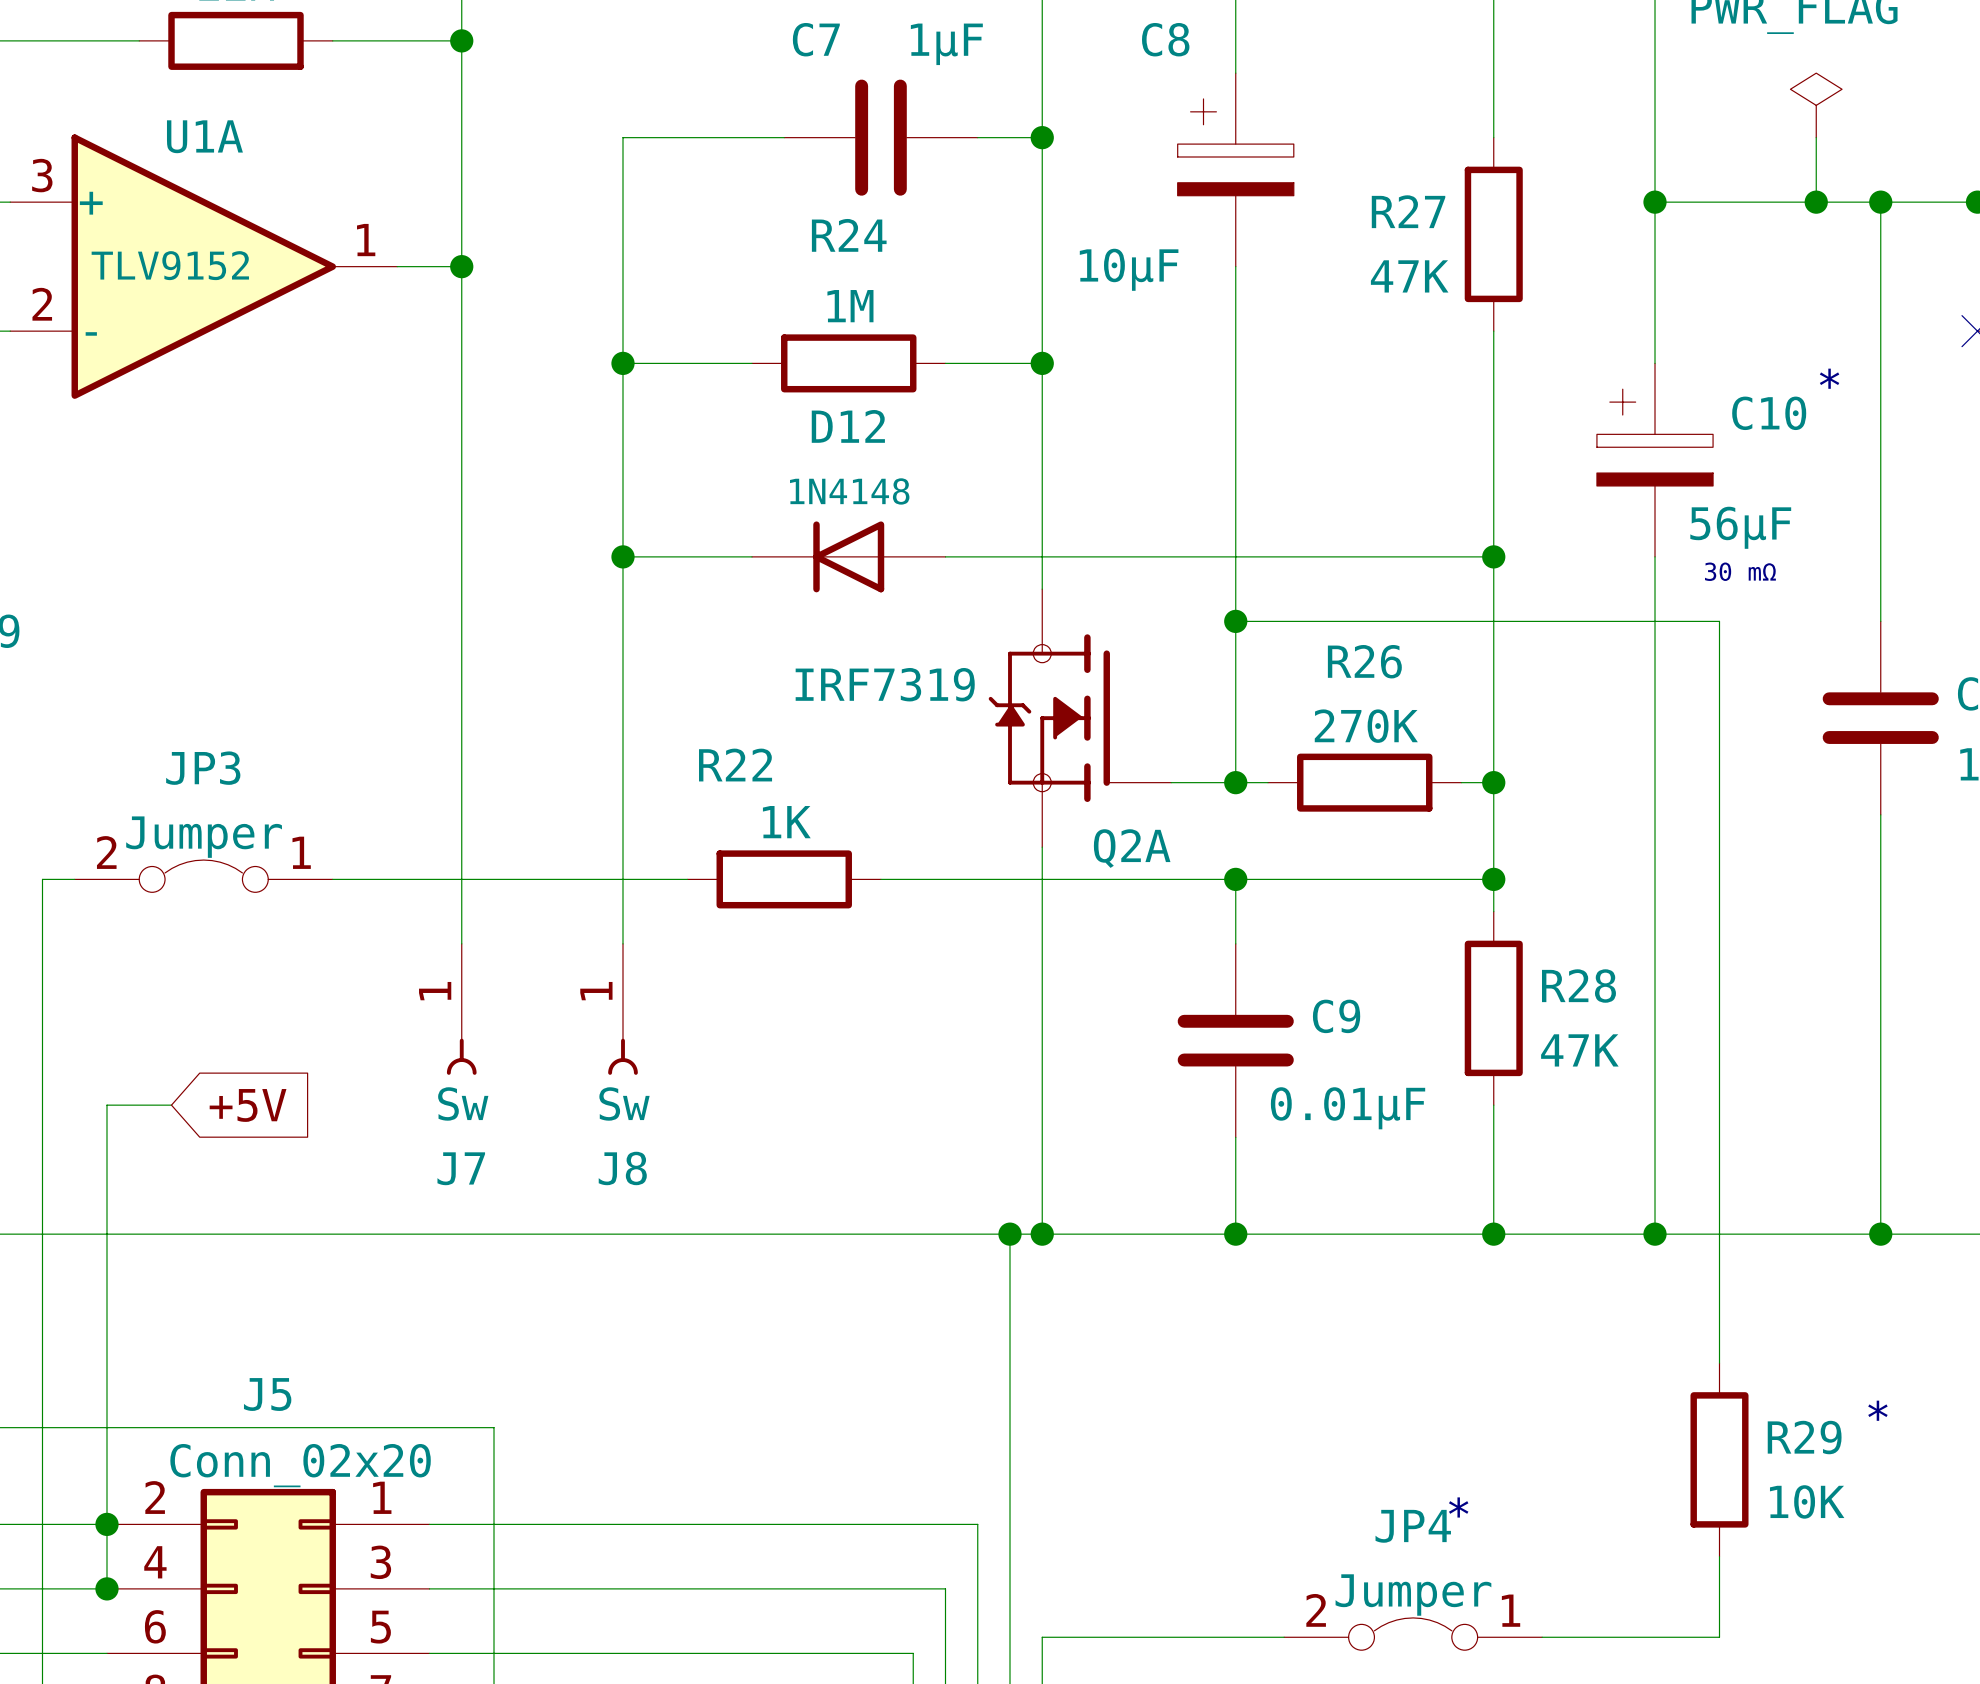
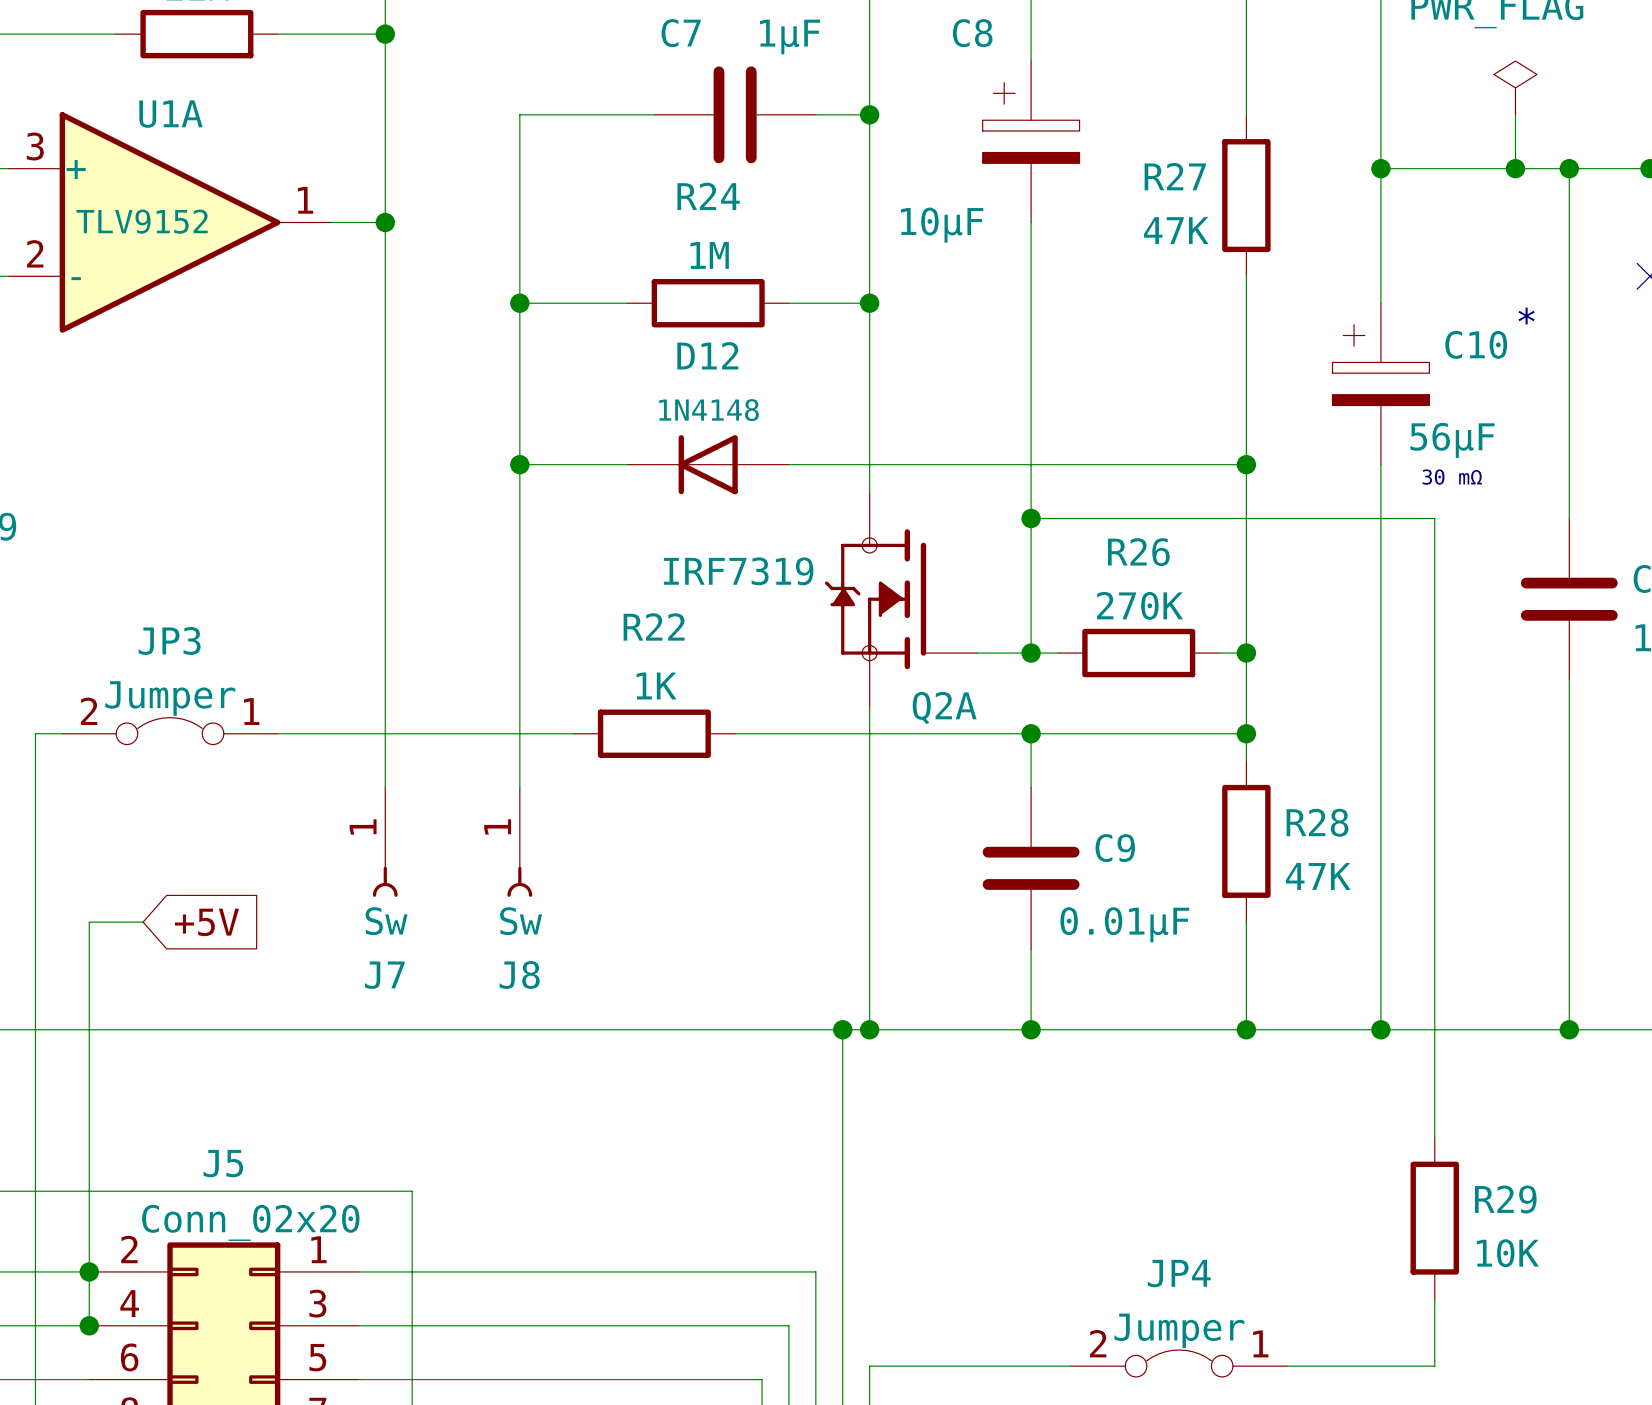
R22 name position: R22 (735, 765) -> R22 (654, 626)
text: * (1877, 1410) -> none
text: * (1458, 1507) -> none

